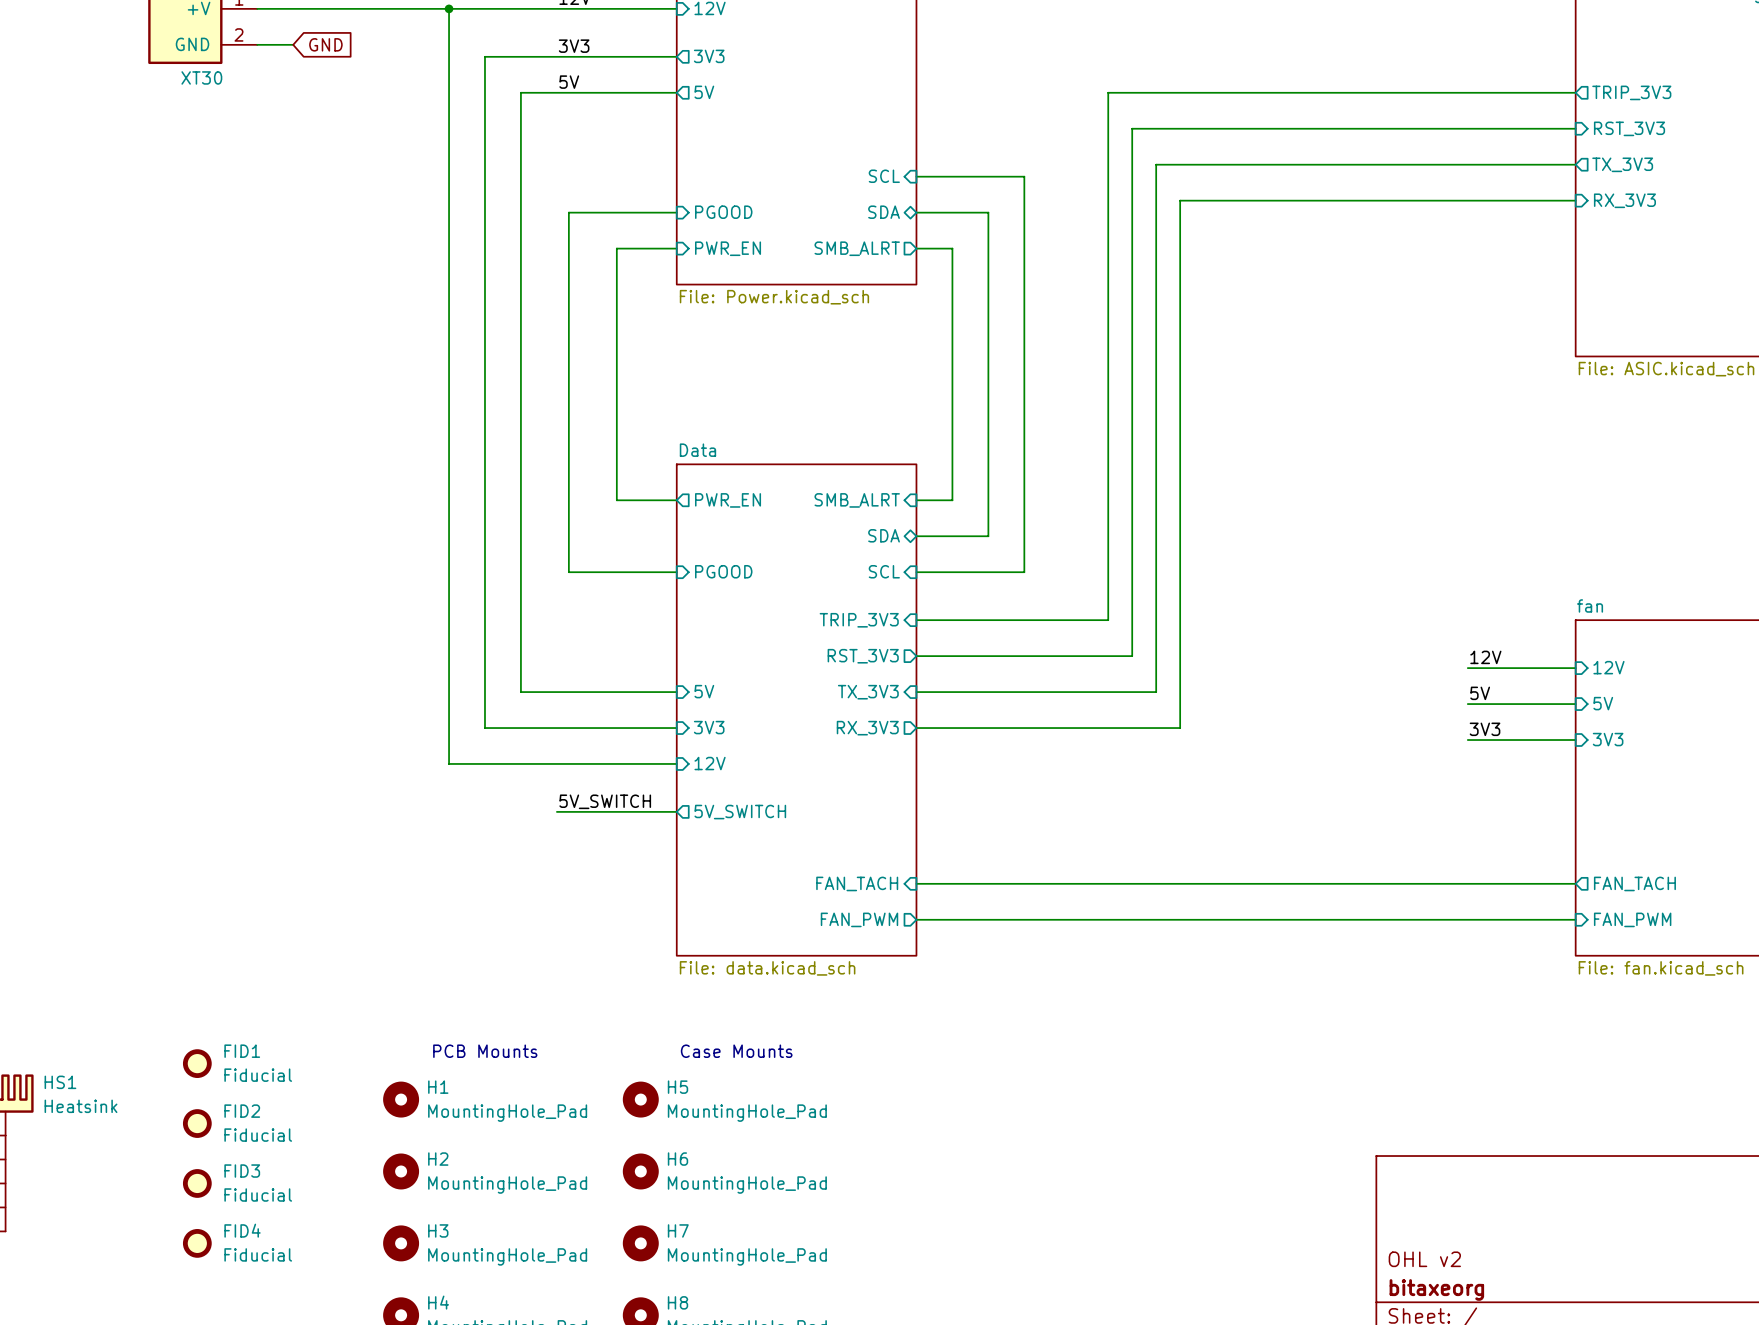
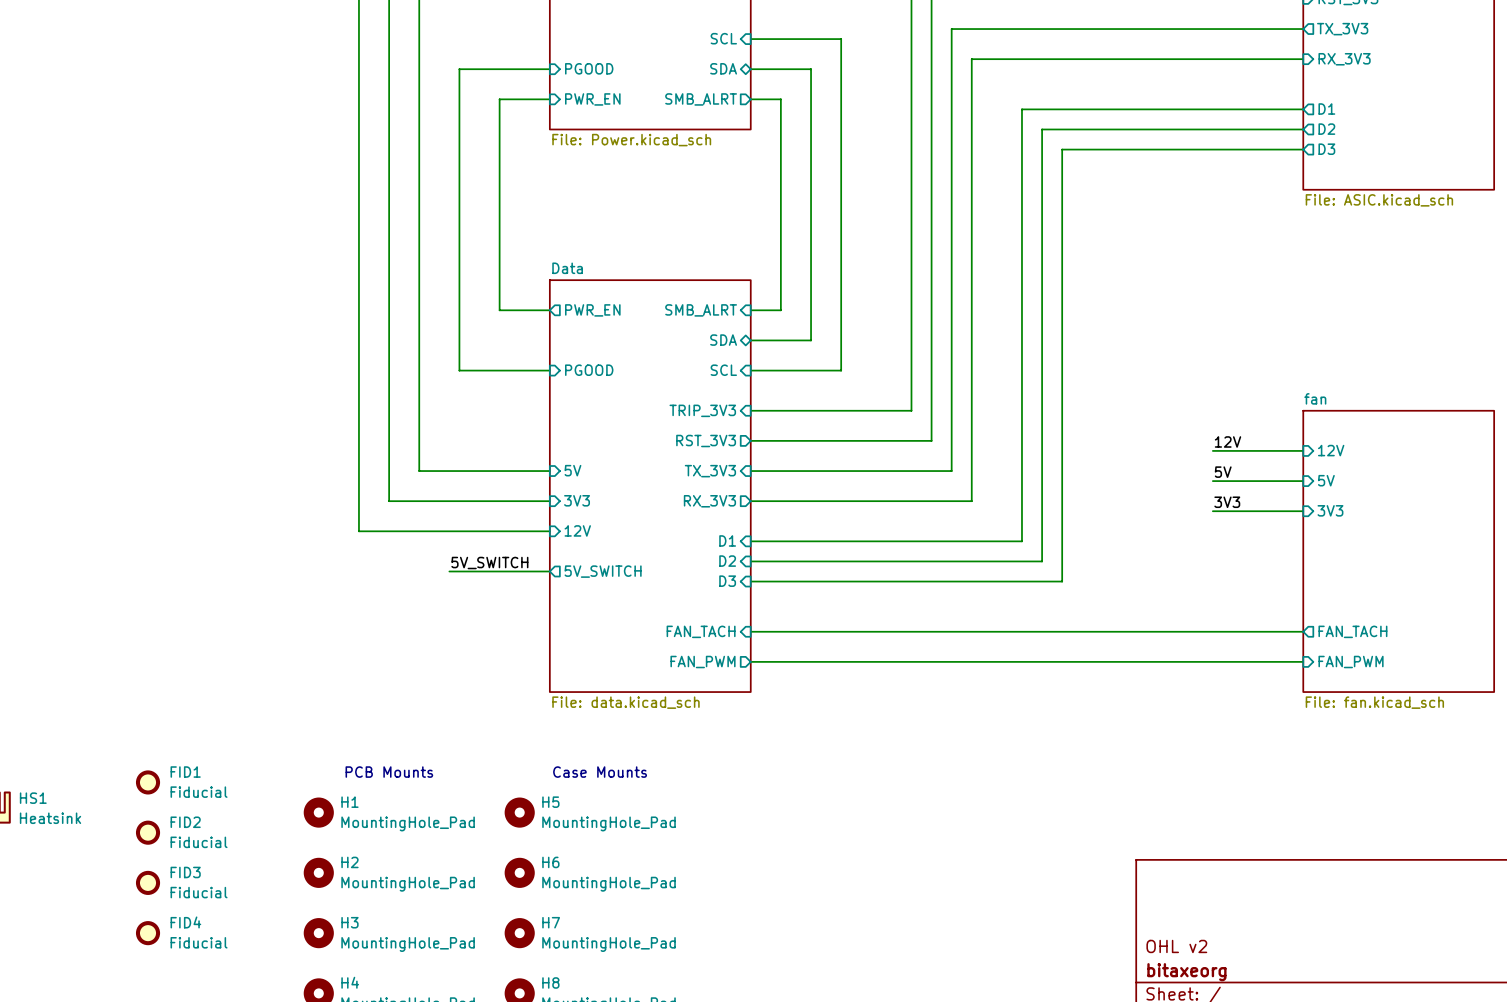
wire: none -> (1303, 109) (1021, 109) (1021, 541) (750, 541)
sheet pin: none -> D1 (1326, 109)
wire: none -> (1303, 129) (1042, 129) (1042, 561) (750, 561)
sheet pin: none -> D2 (1326, 129)
wire: none -> (1303, 149) (1062, 149) (1062, 581) (750, 581)
sheet pin: none -> D3 (1326, 149)
sheet pin: none -> D1 (727, 540)
sheet pin: none -> D2 (727, 561)
sheet pin: none -> D3 (727, 581)

